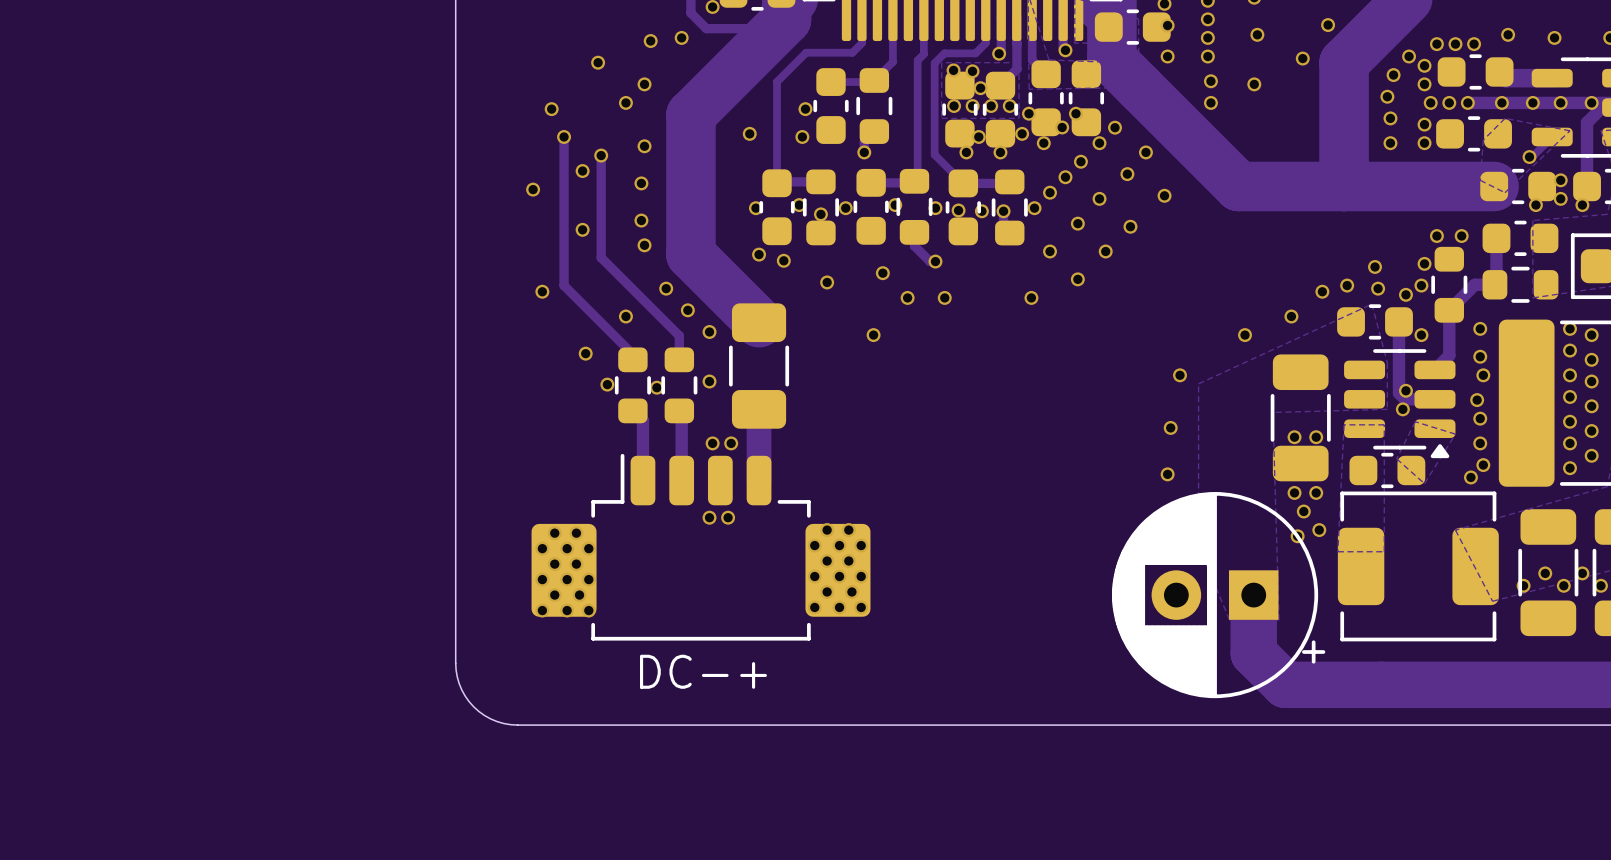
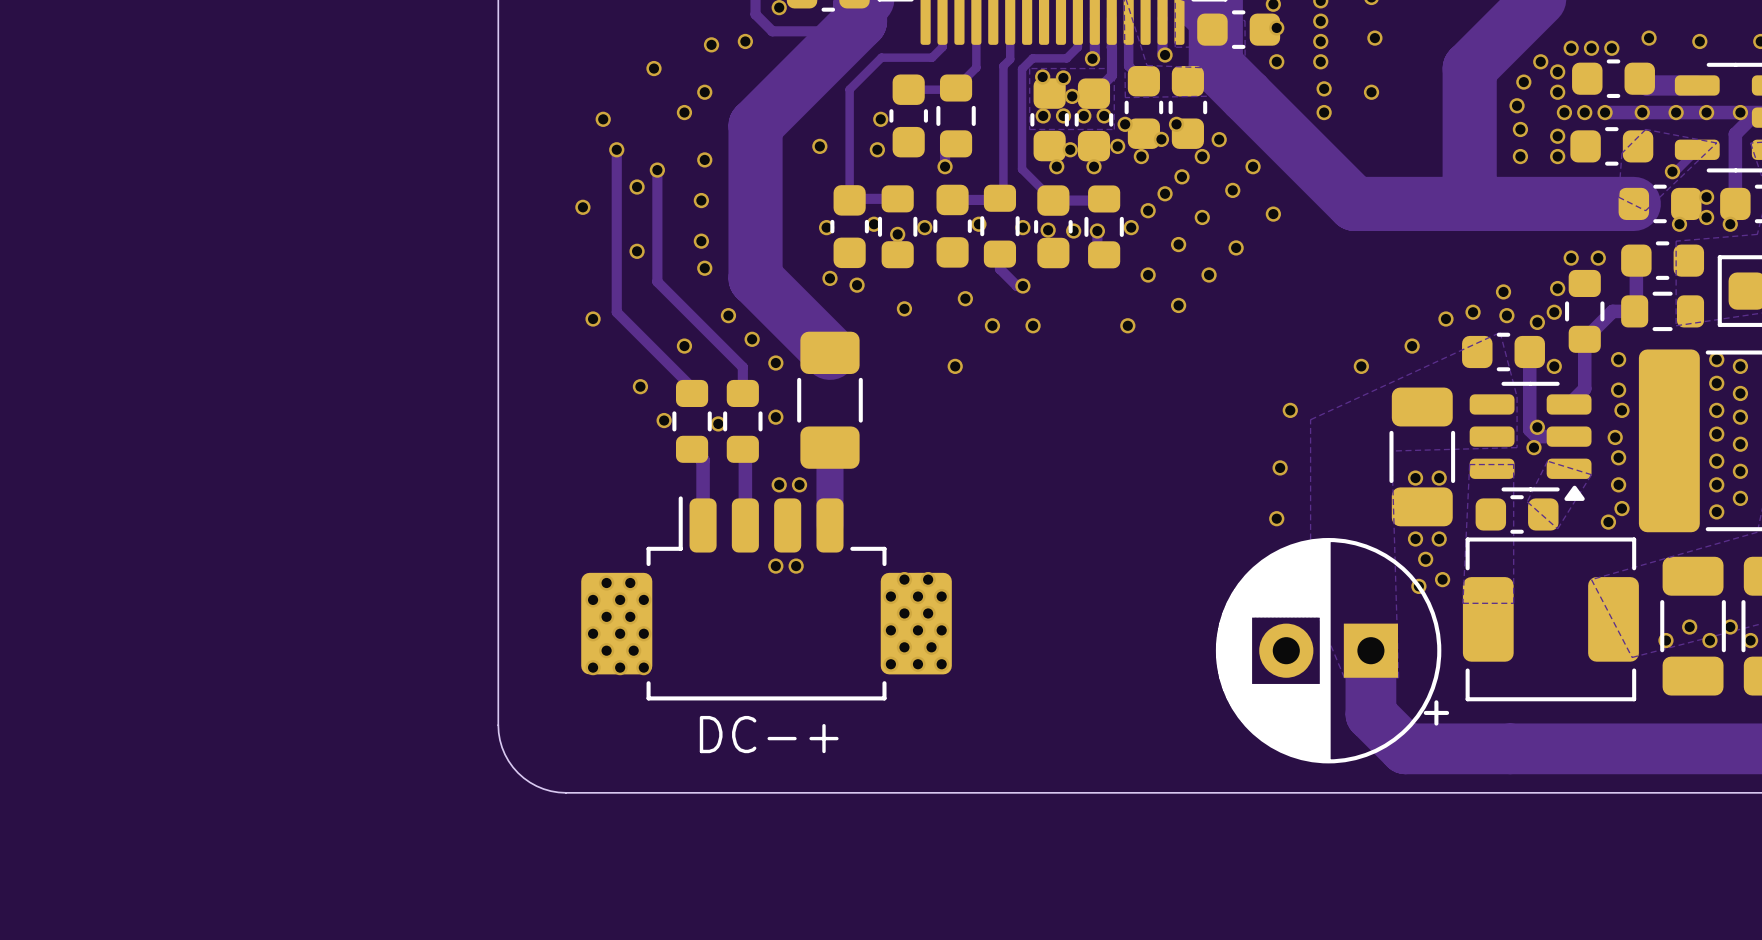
via: (1328, 25) -> none
via: (1302, 58) -> none

